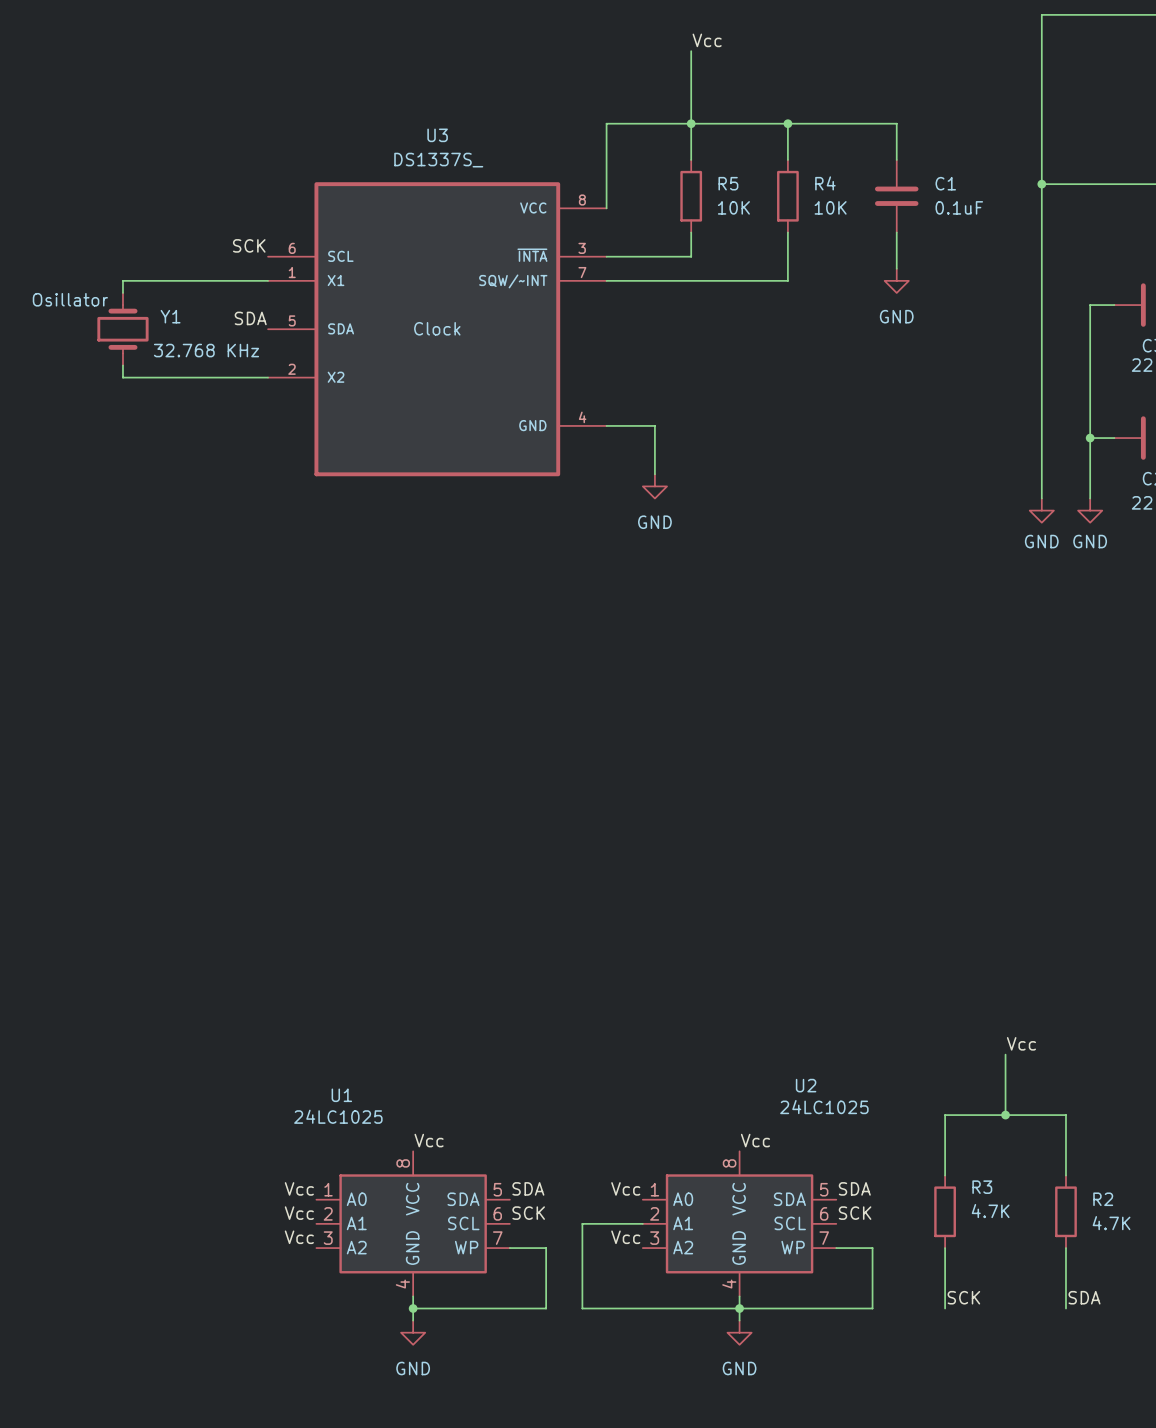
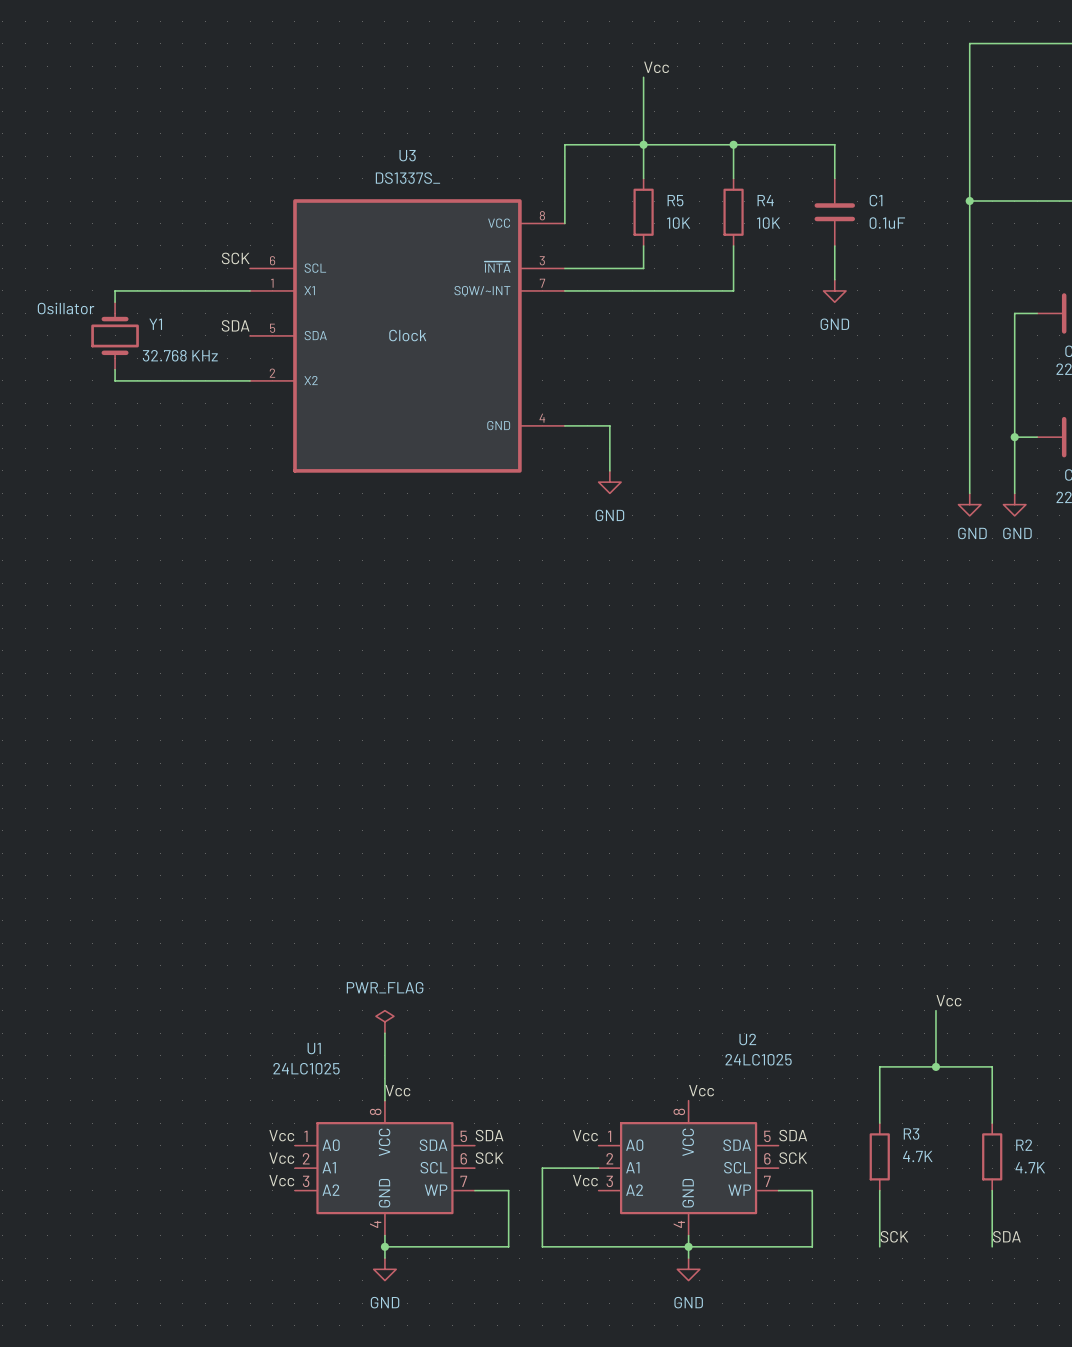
power symbol: none -> PWR_FLAG (384, 1021)
wire: none -> (384, 1033) (384, 1100)

